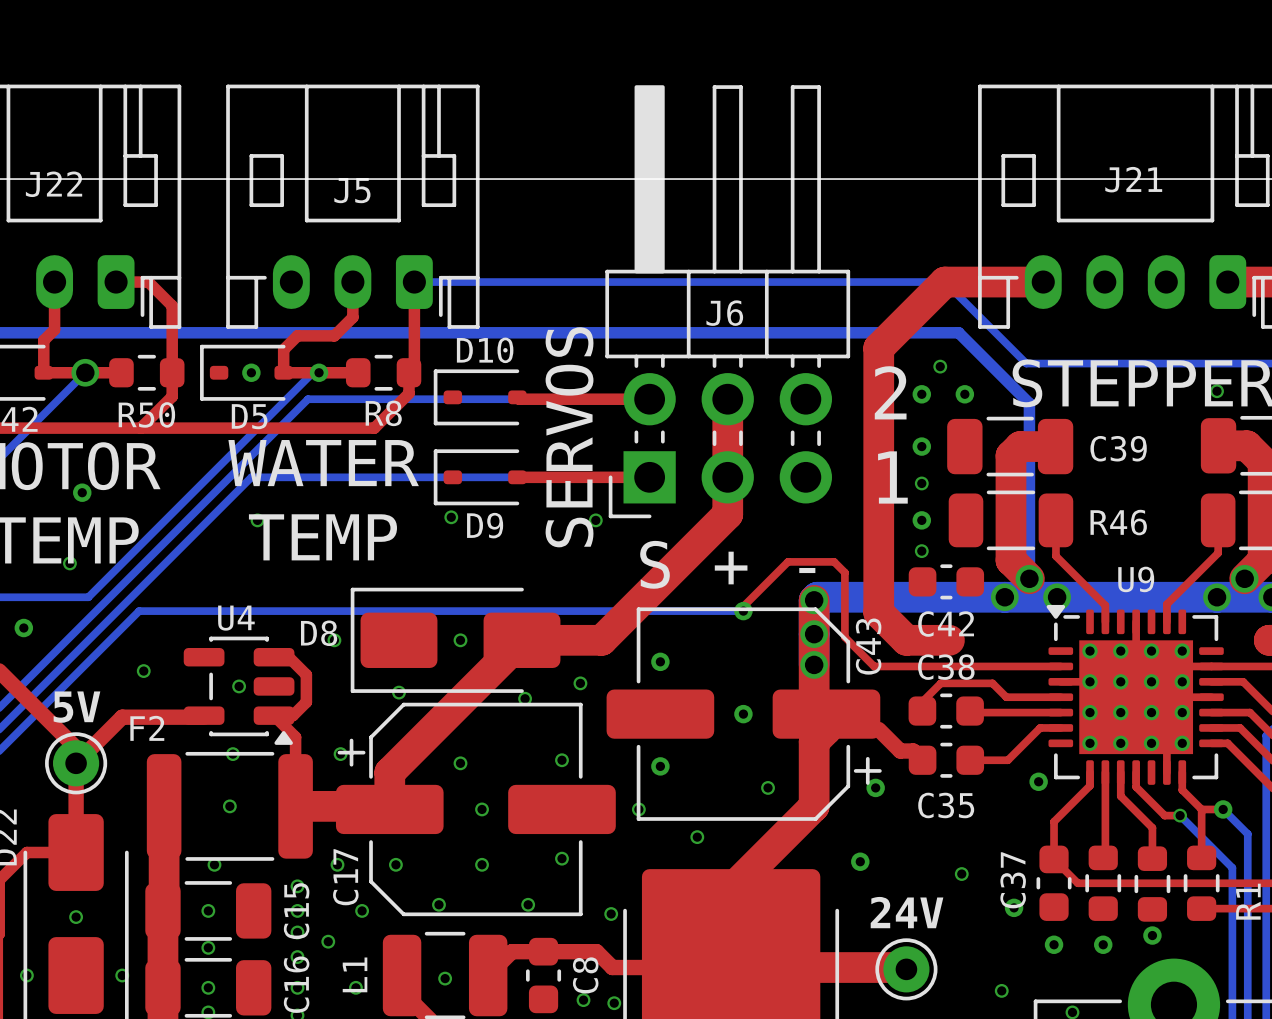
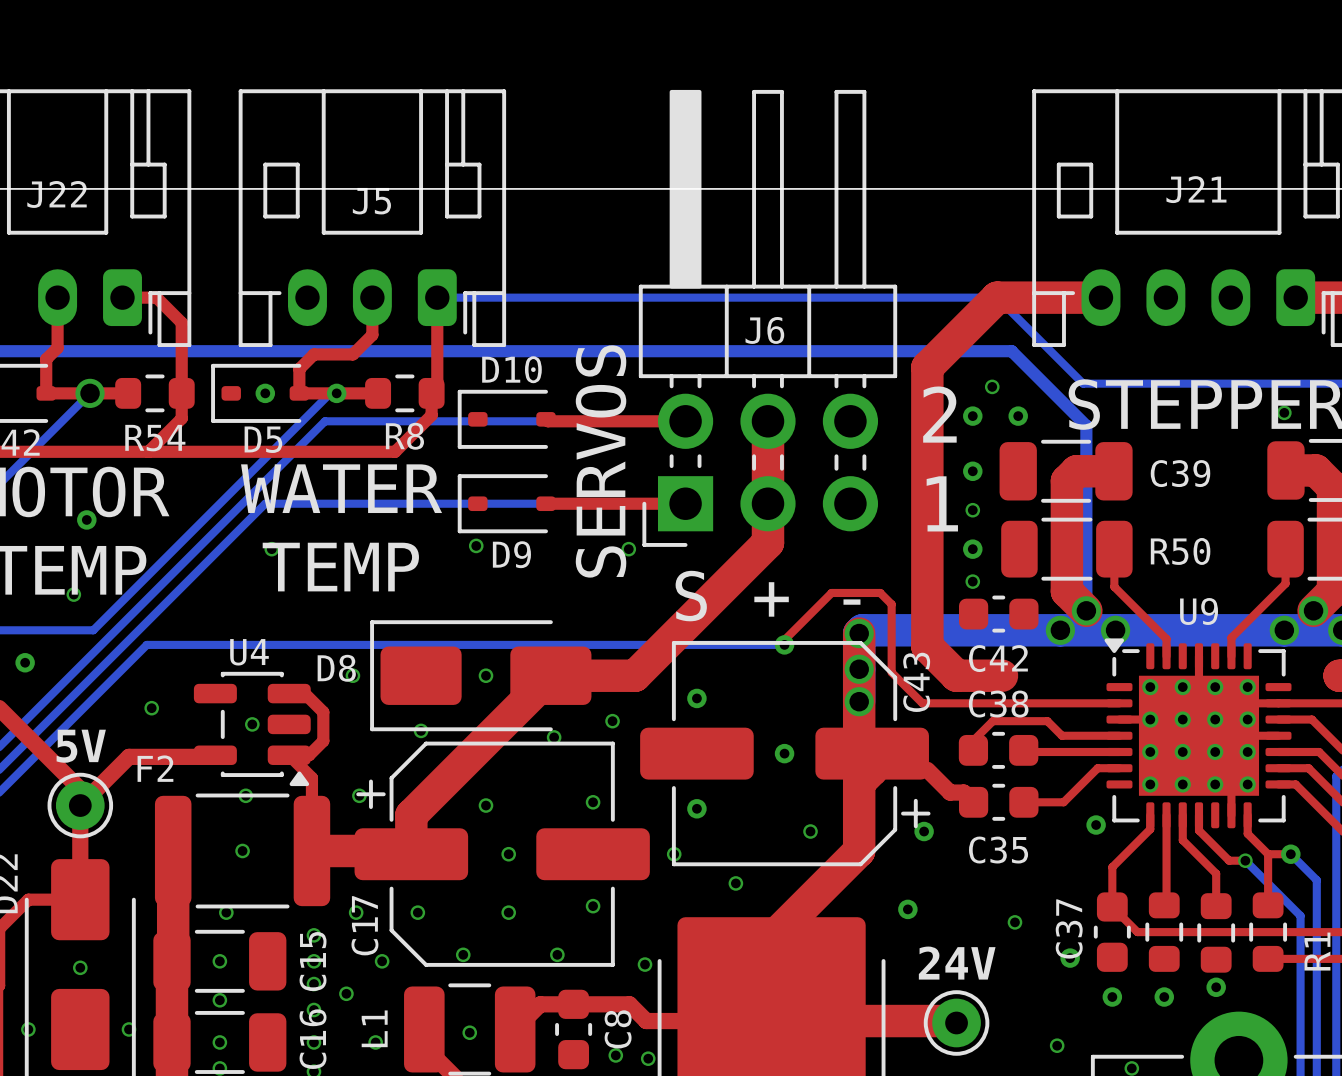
R50 name: R50 (146, 414) -> R54 (155, 438)
R46 name: R46 (1118, 522) -> R50 (1180, 551)

